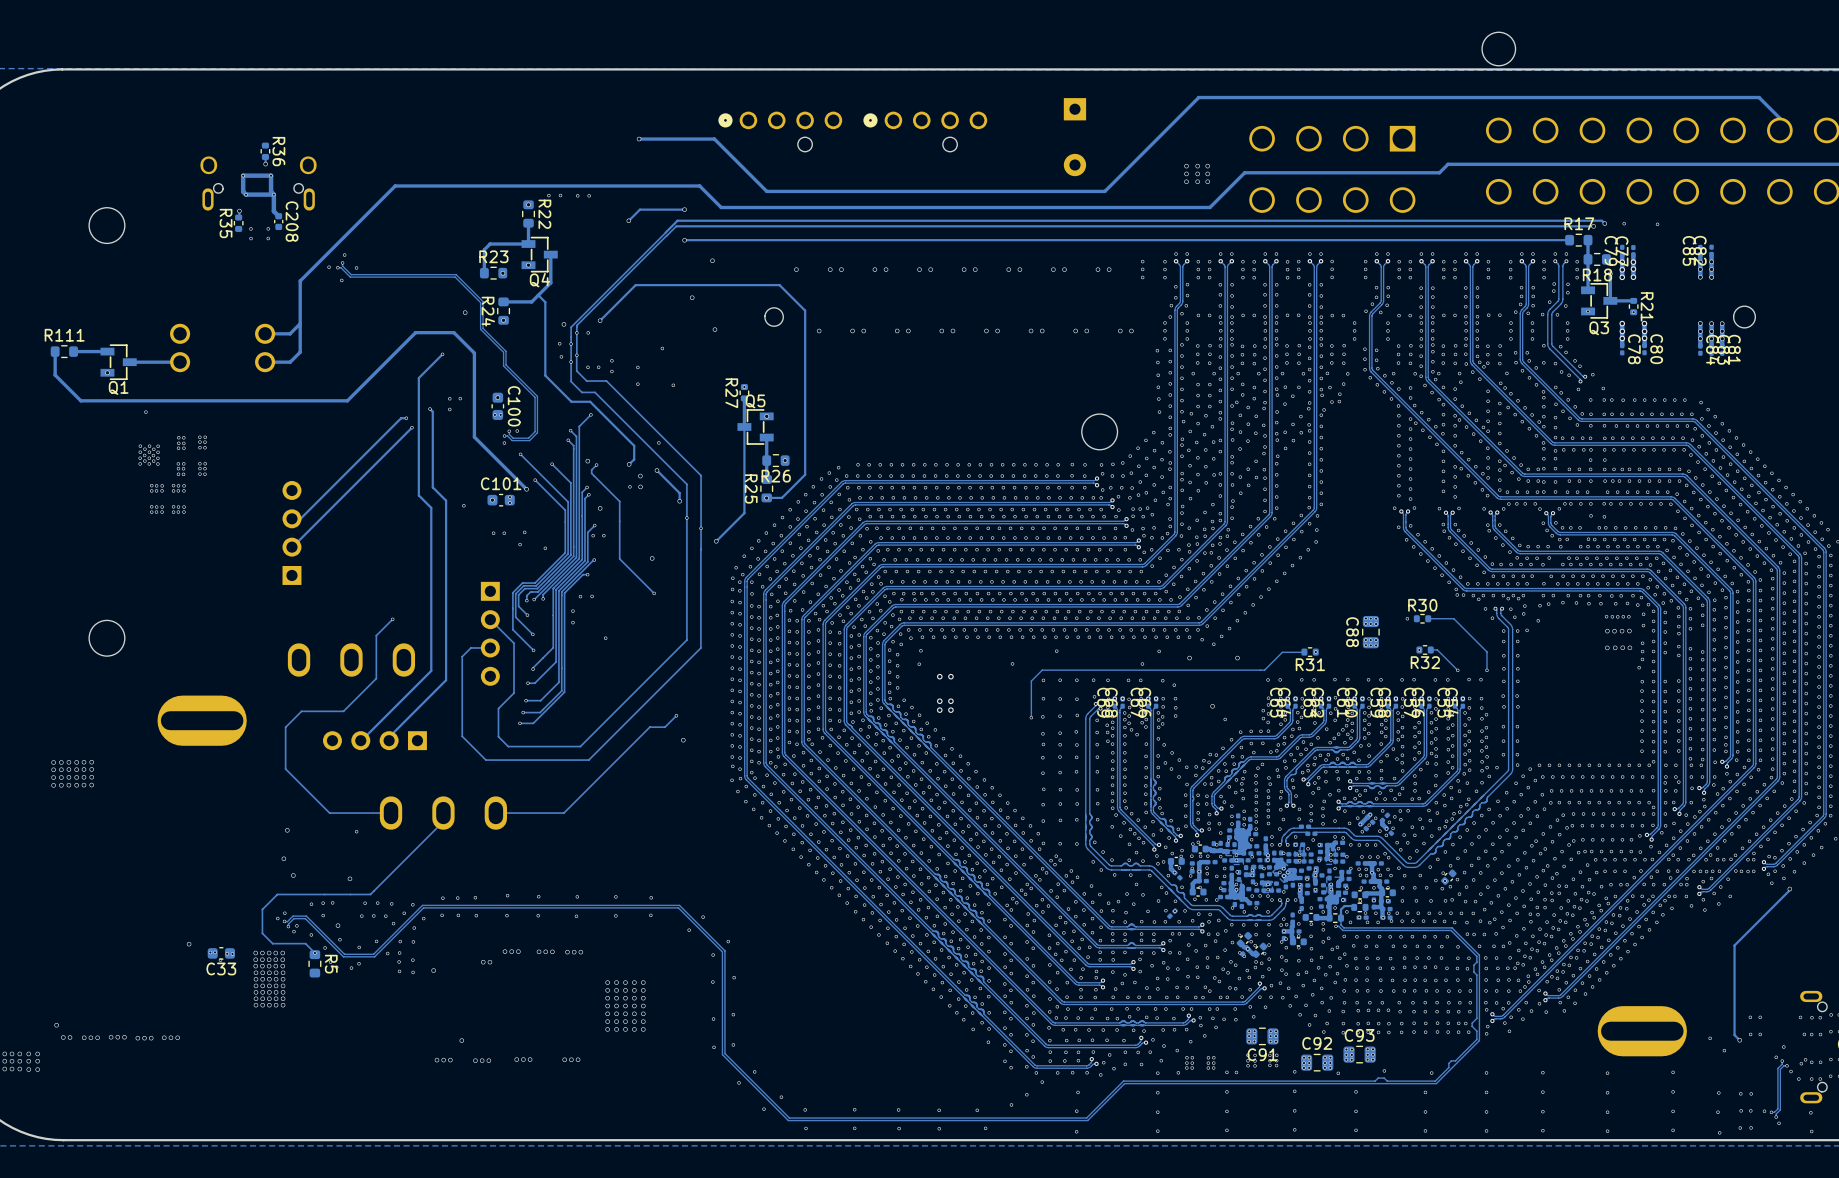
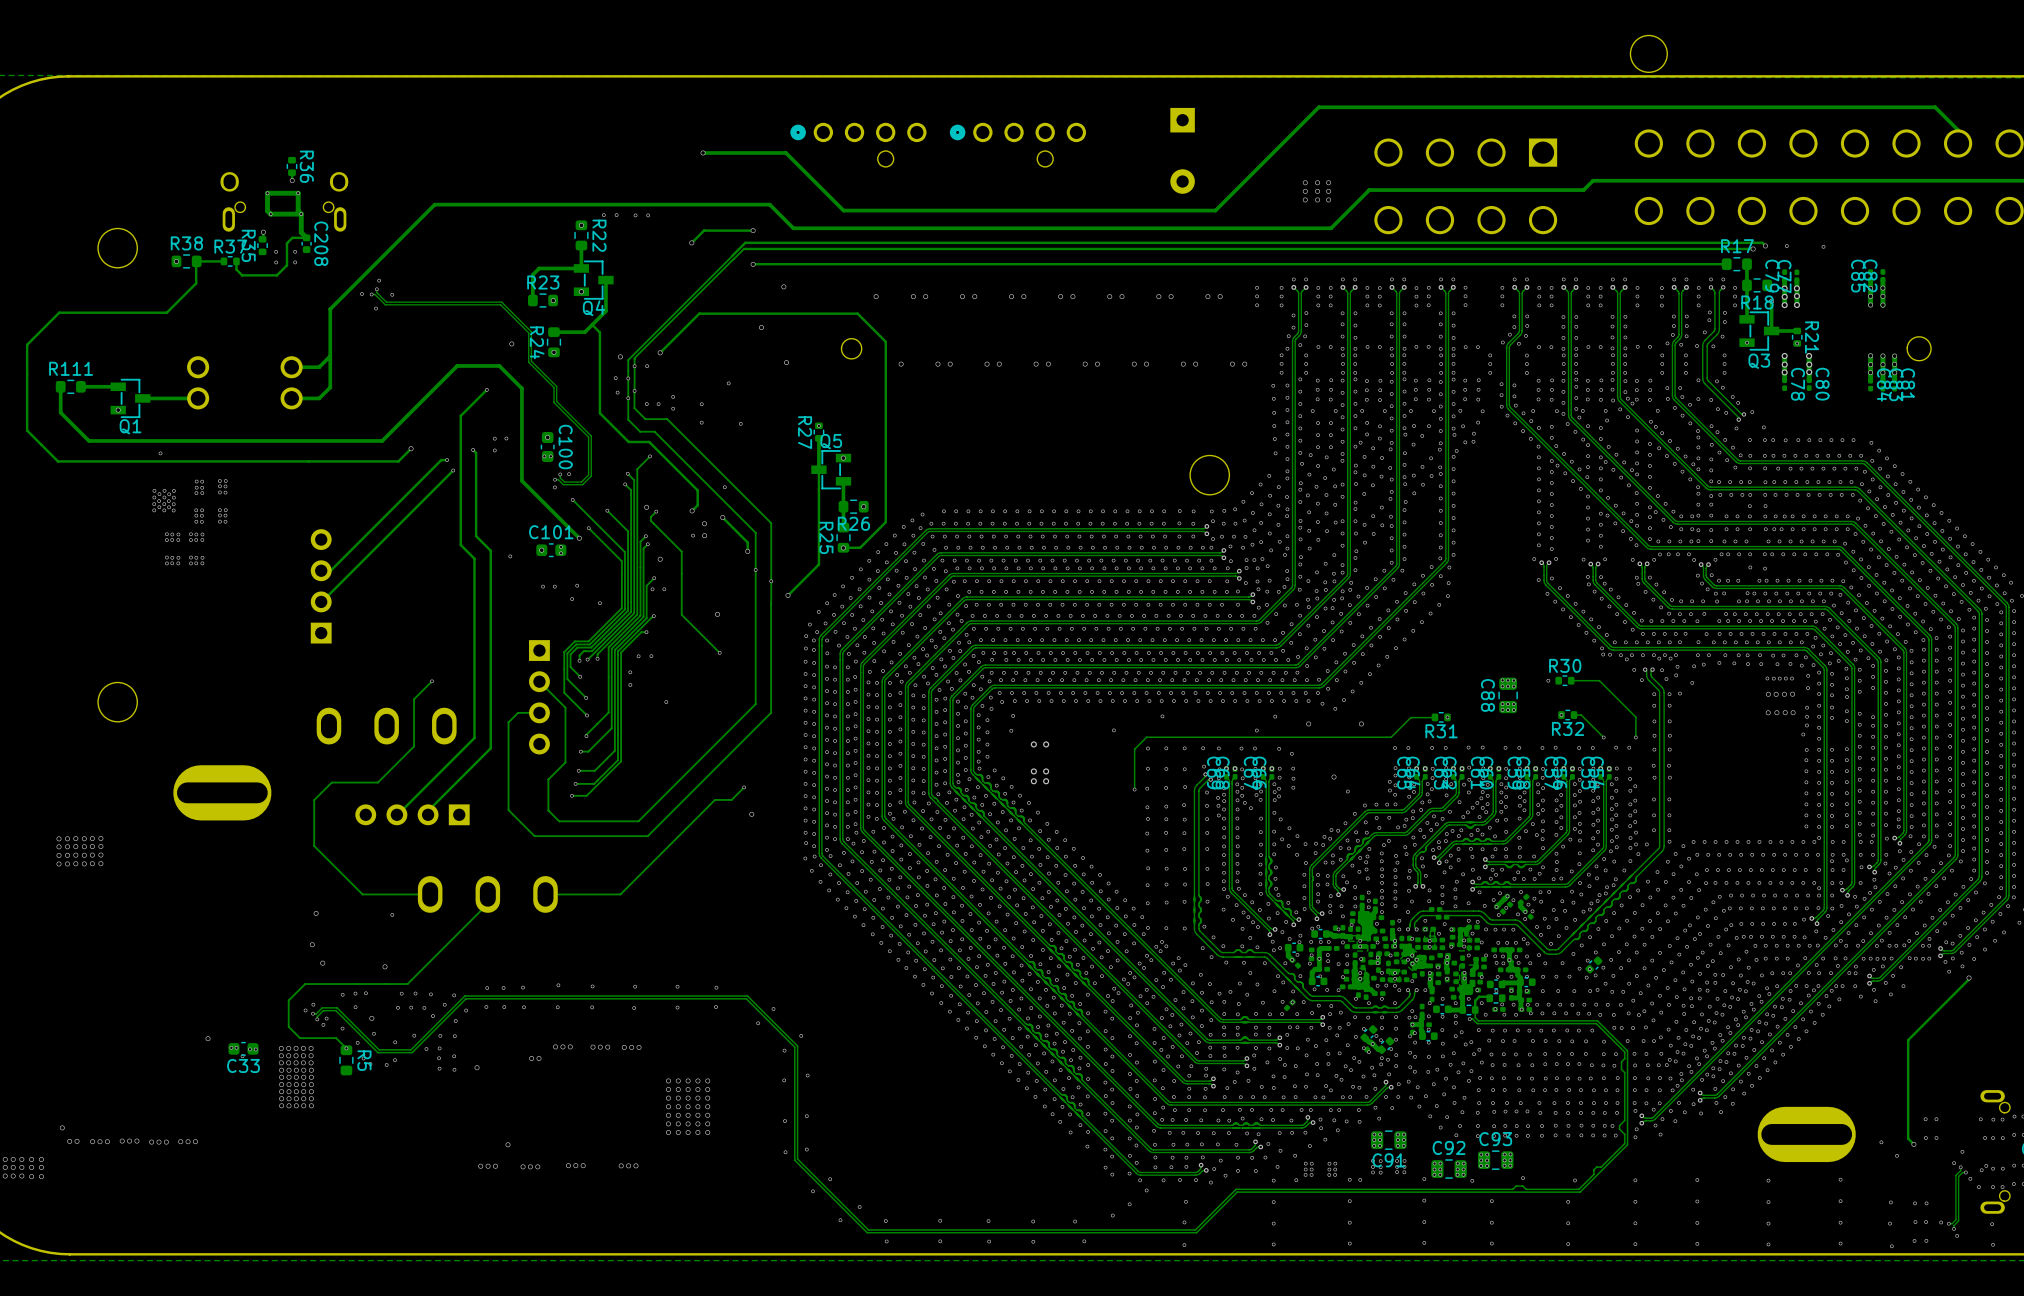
track: none -> (306, 237) (292, 237) (286, 243) (286, 265) (276, 275) (242, 275) (236, 269) (236, 261)
via: none -> (176, 261)
R38: none -> (186, 261)
track: none -> (196, 261) (196, 283) (166, 312) (59, 312) (27, 344) (27, 430) (58, 461) (398, 461) (411, 448)
track: none -> (223, 261) (196, 261)
R37: none -> (230, 261)
via: none -> (411, 448)

